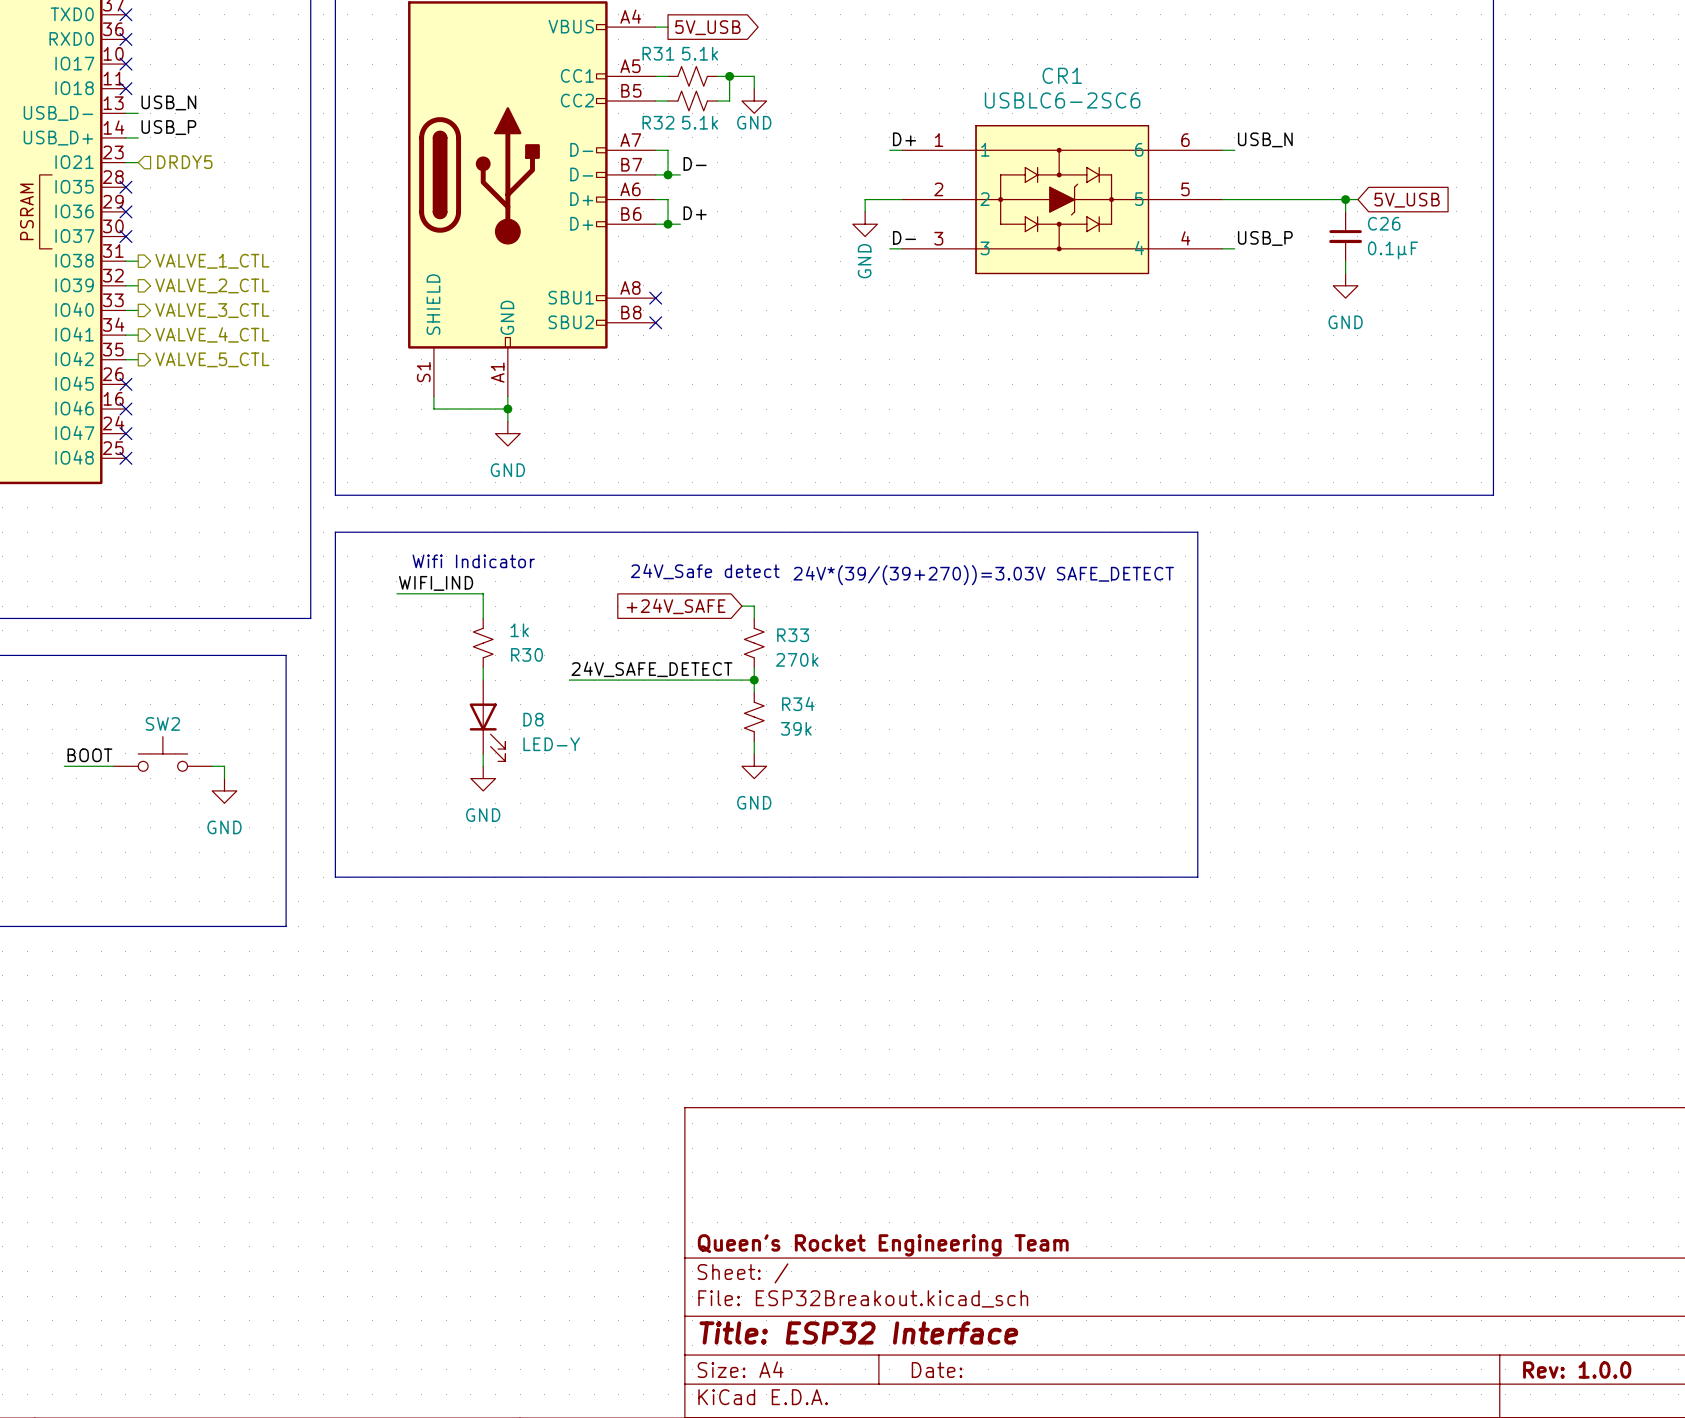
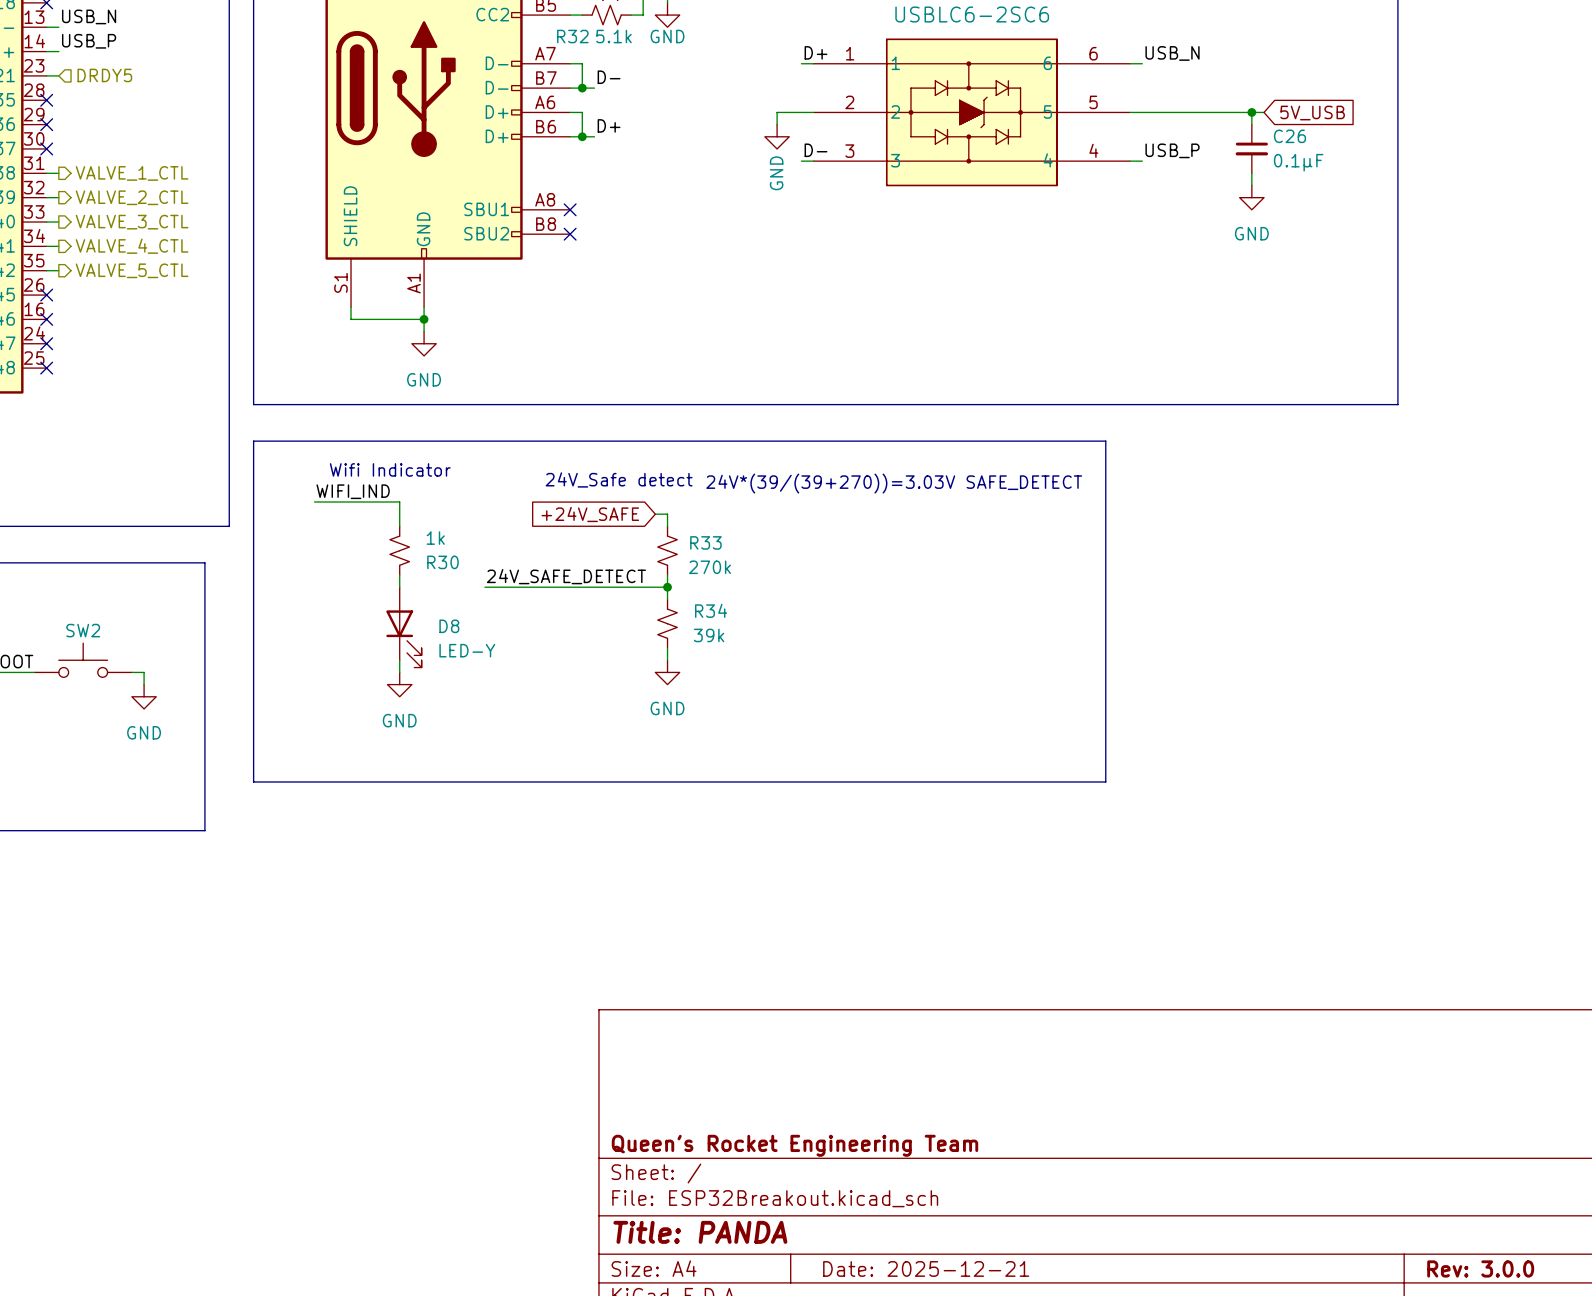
title block: Title: ESP32 Interface (858, 1332) -> Title: PANDA (700, 1232)
title block: Date: (937, 1370) -> Date: 2025-12-21 (926, 1268)
title block: Rev: 1.0.0 (1577, 1370) -> Rev: 3.0.0 (1480, 1268)

